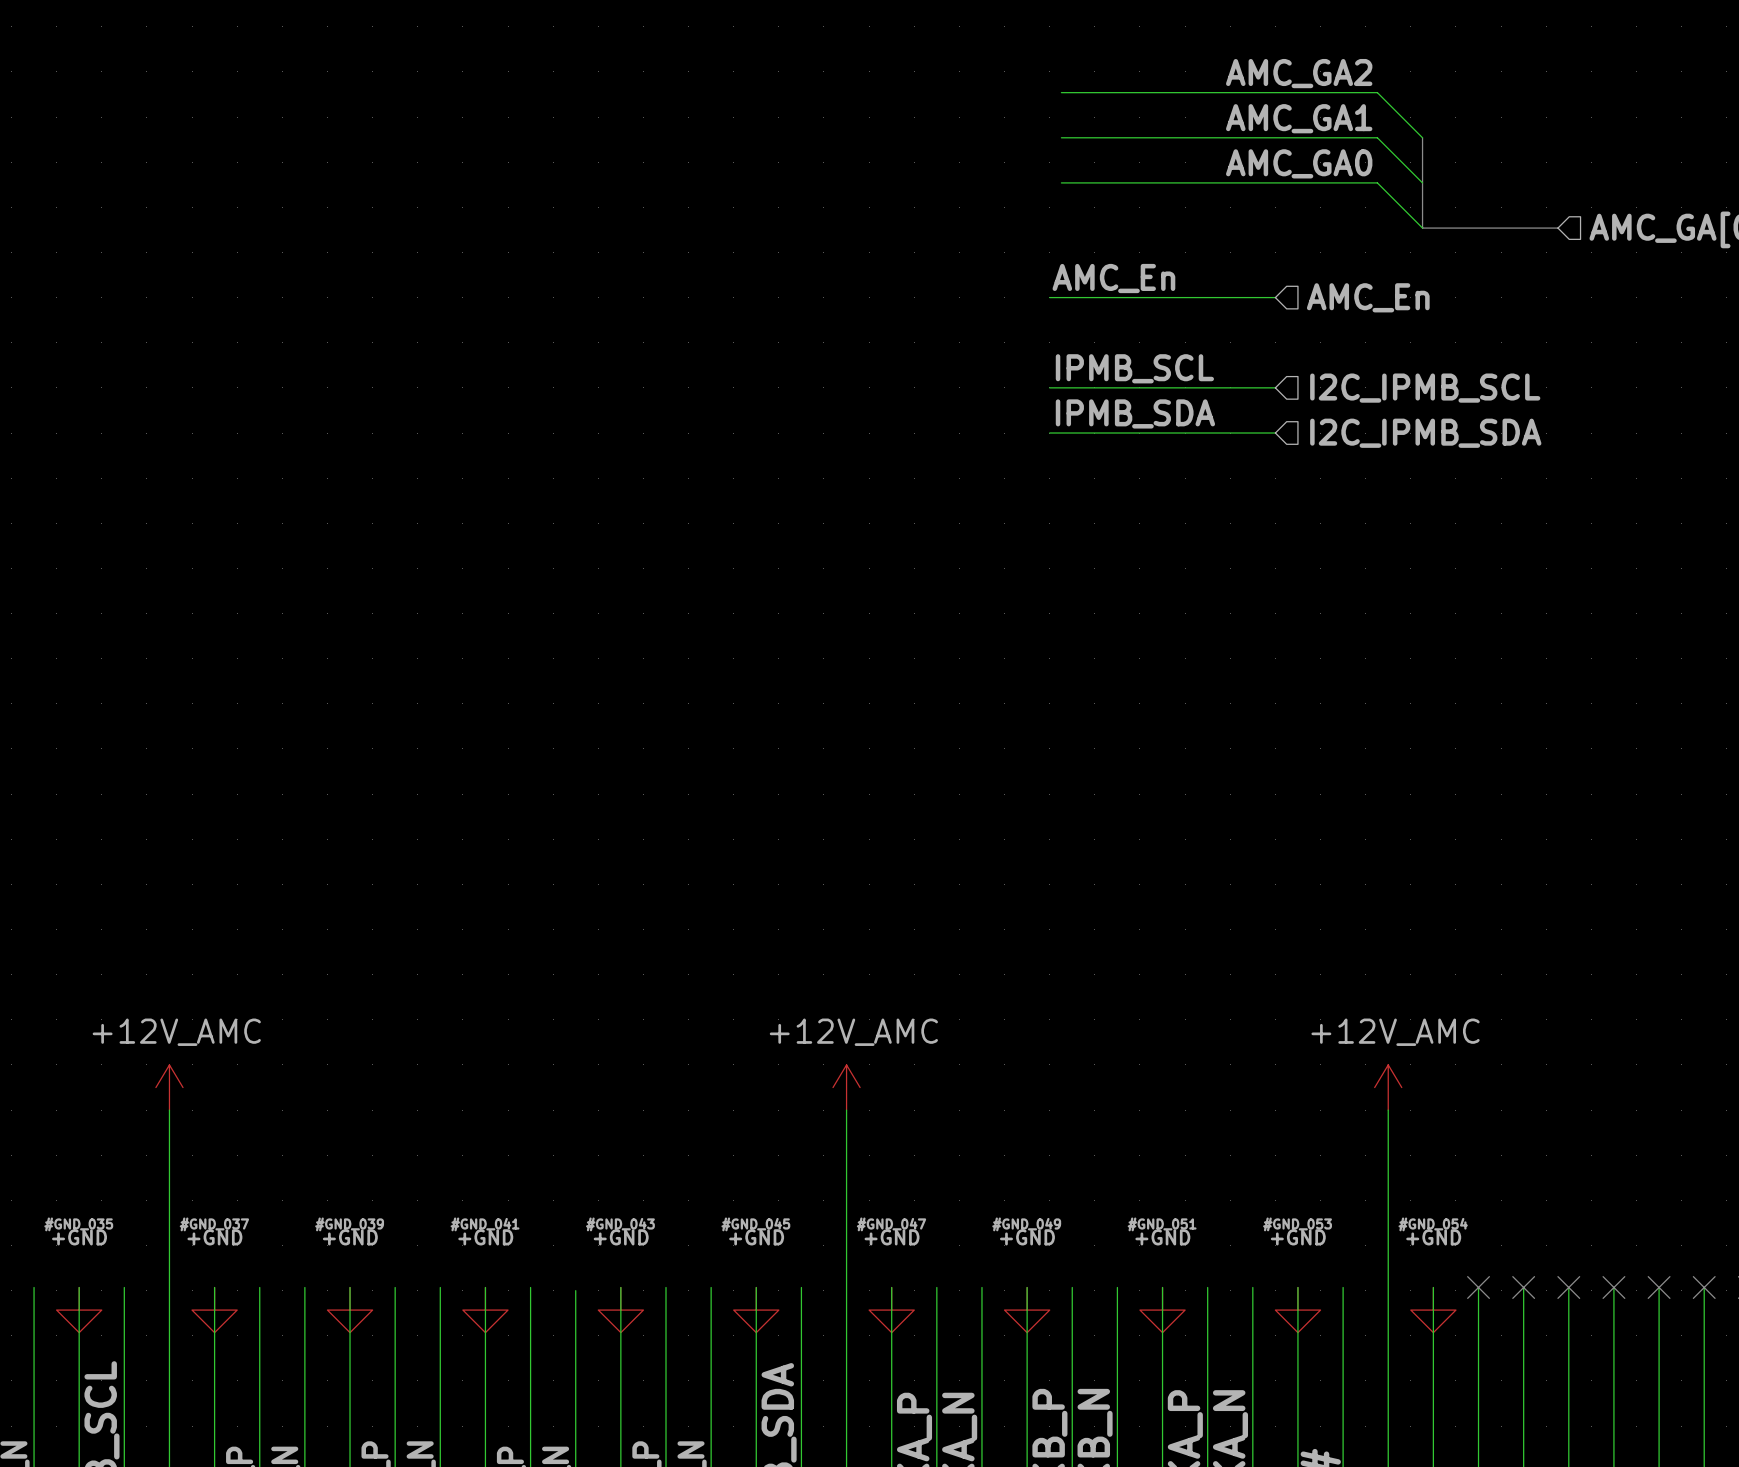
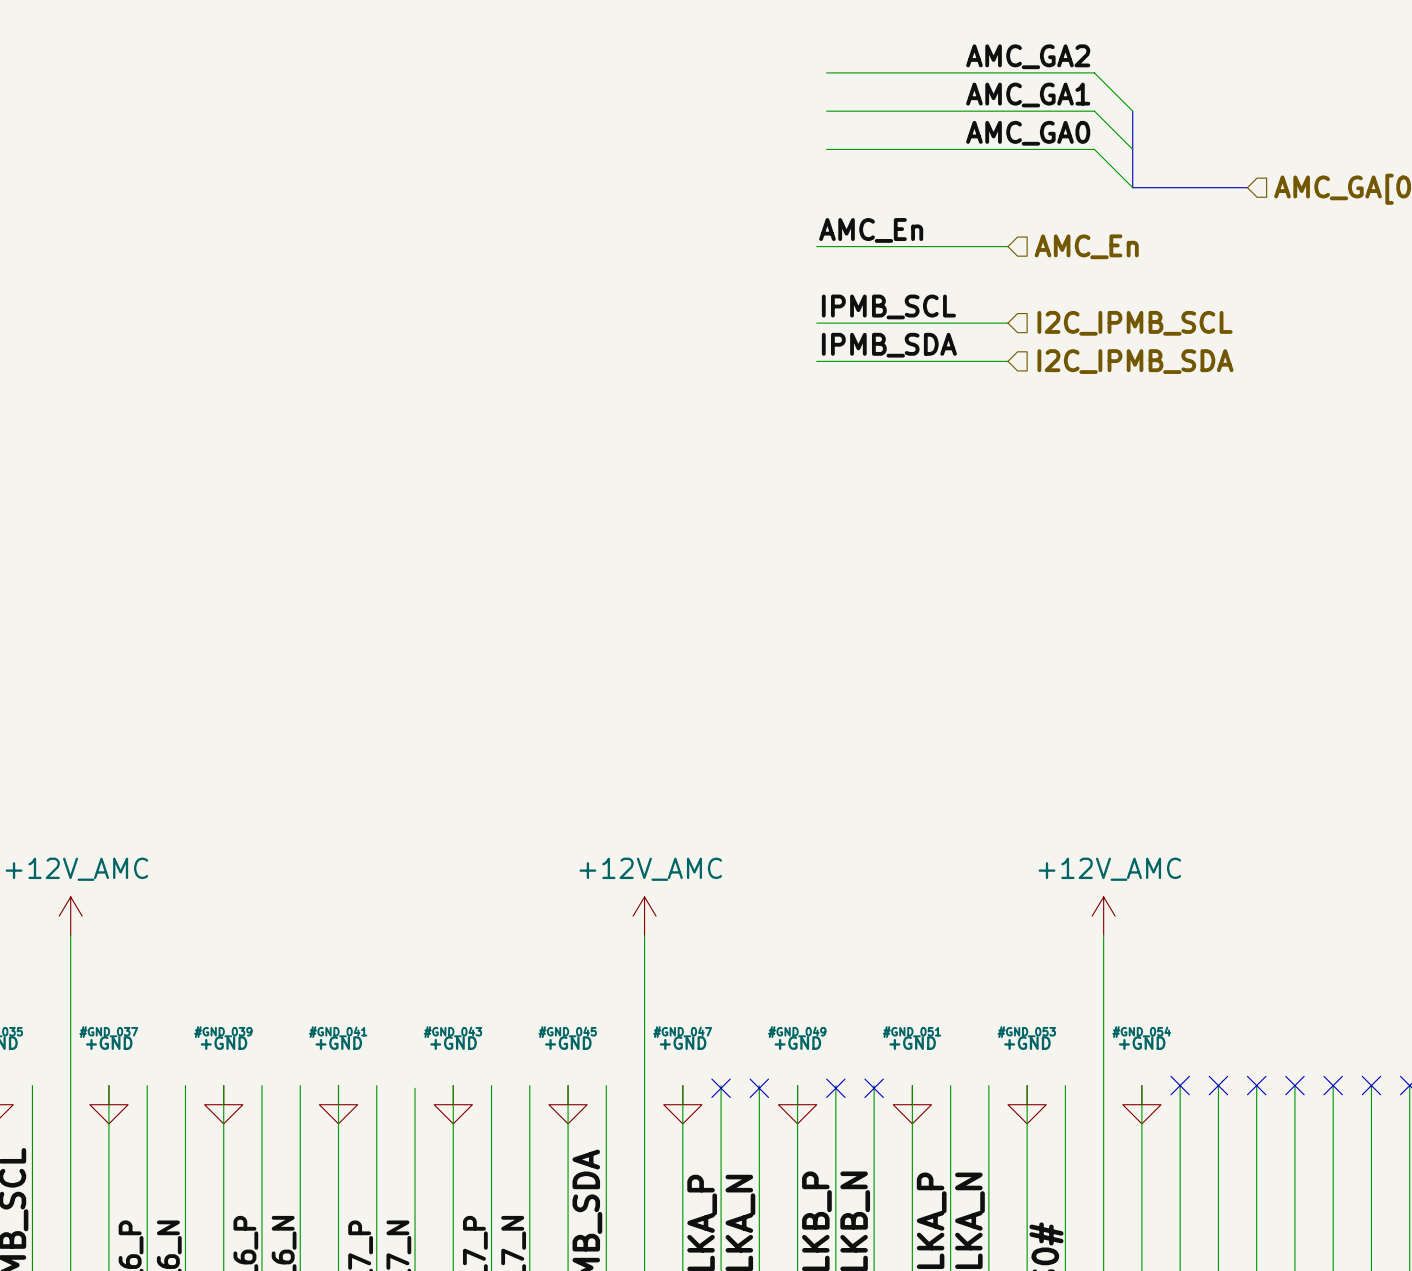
no-connect mark: none -> (721, 1088)
no-connect mark: none -> (759, 1088)
no-connect mark: none -> (835, 1088)
no-connect mark: none -> (874, 1088)

